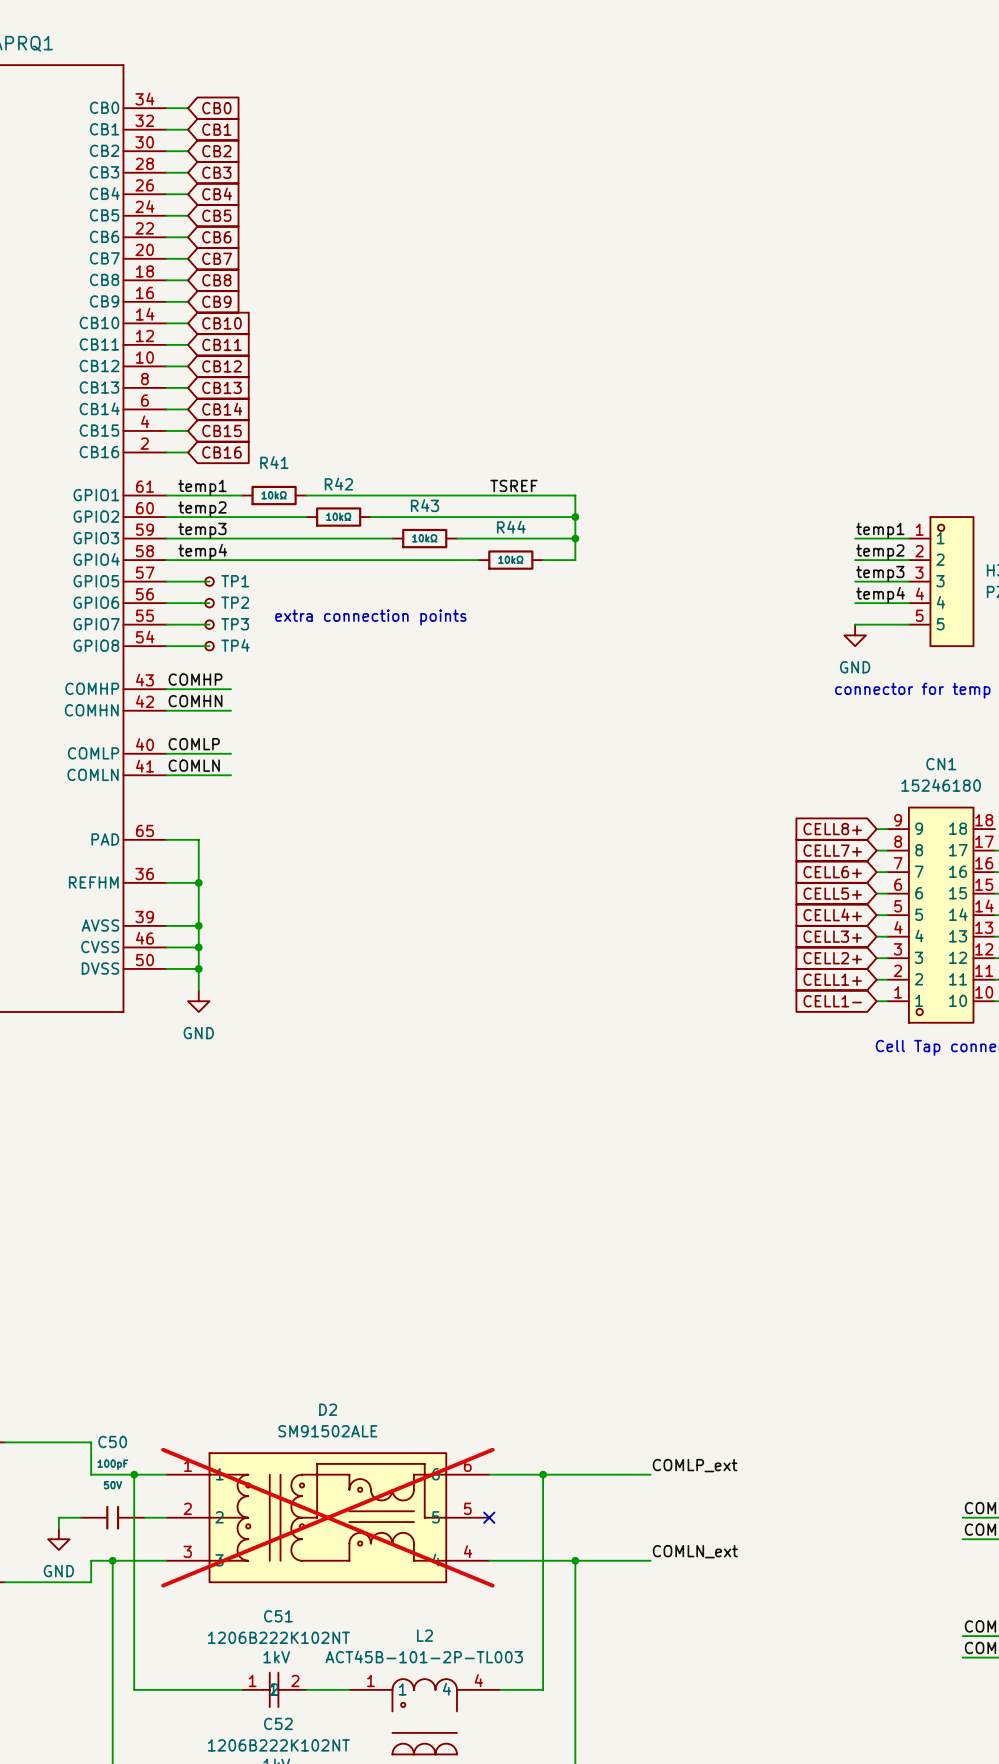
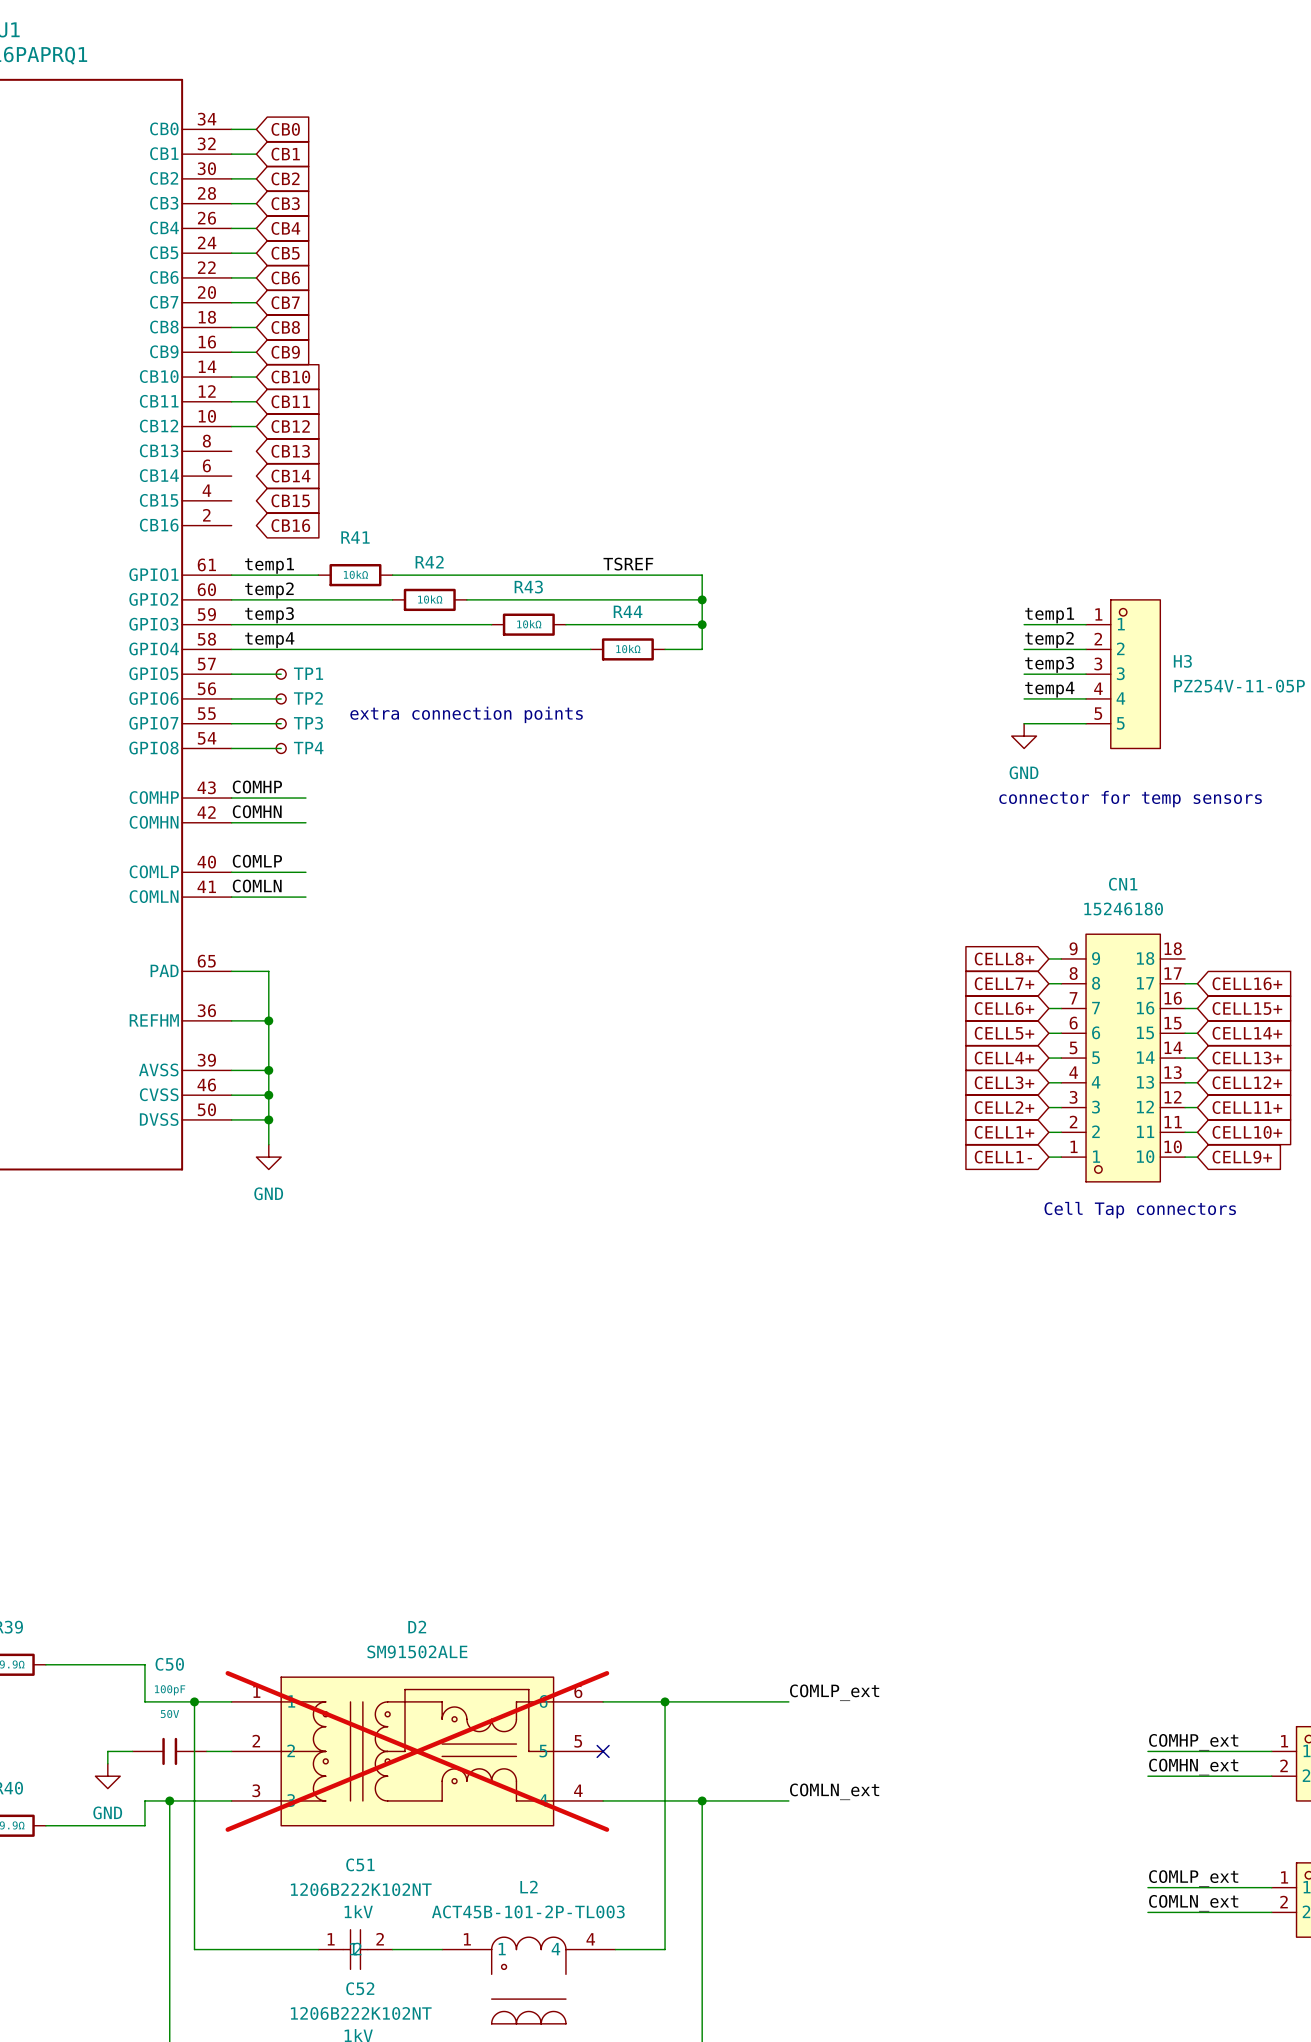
wire: (166, 387) (188, 387) -> none
wire: (166, 409) (188, 409) -> none
wire: (166, 430) (188, 430) -> none
wire: (166, 452) (188, 452) -> none

